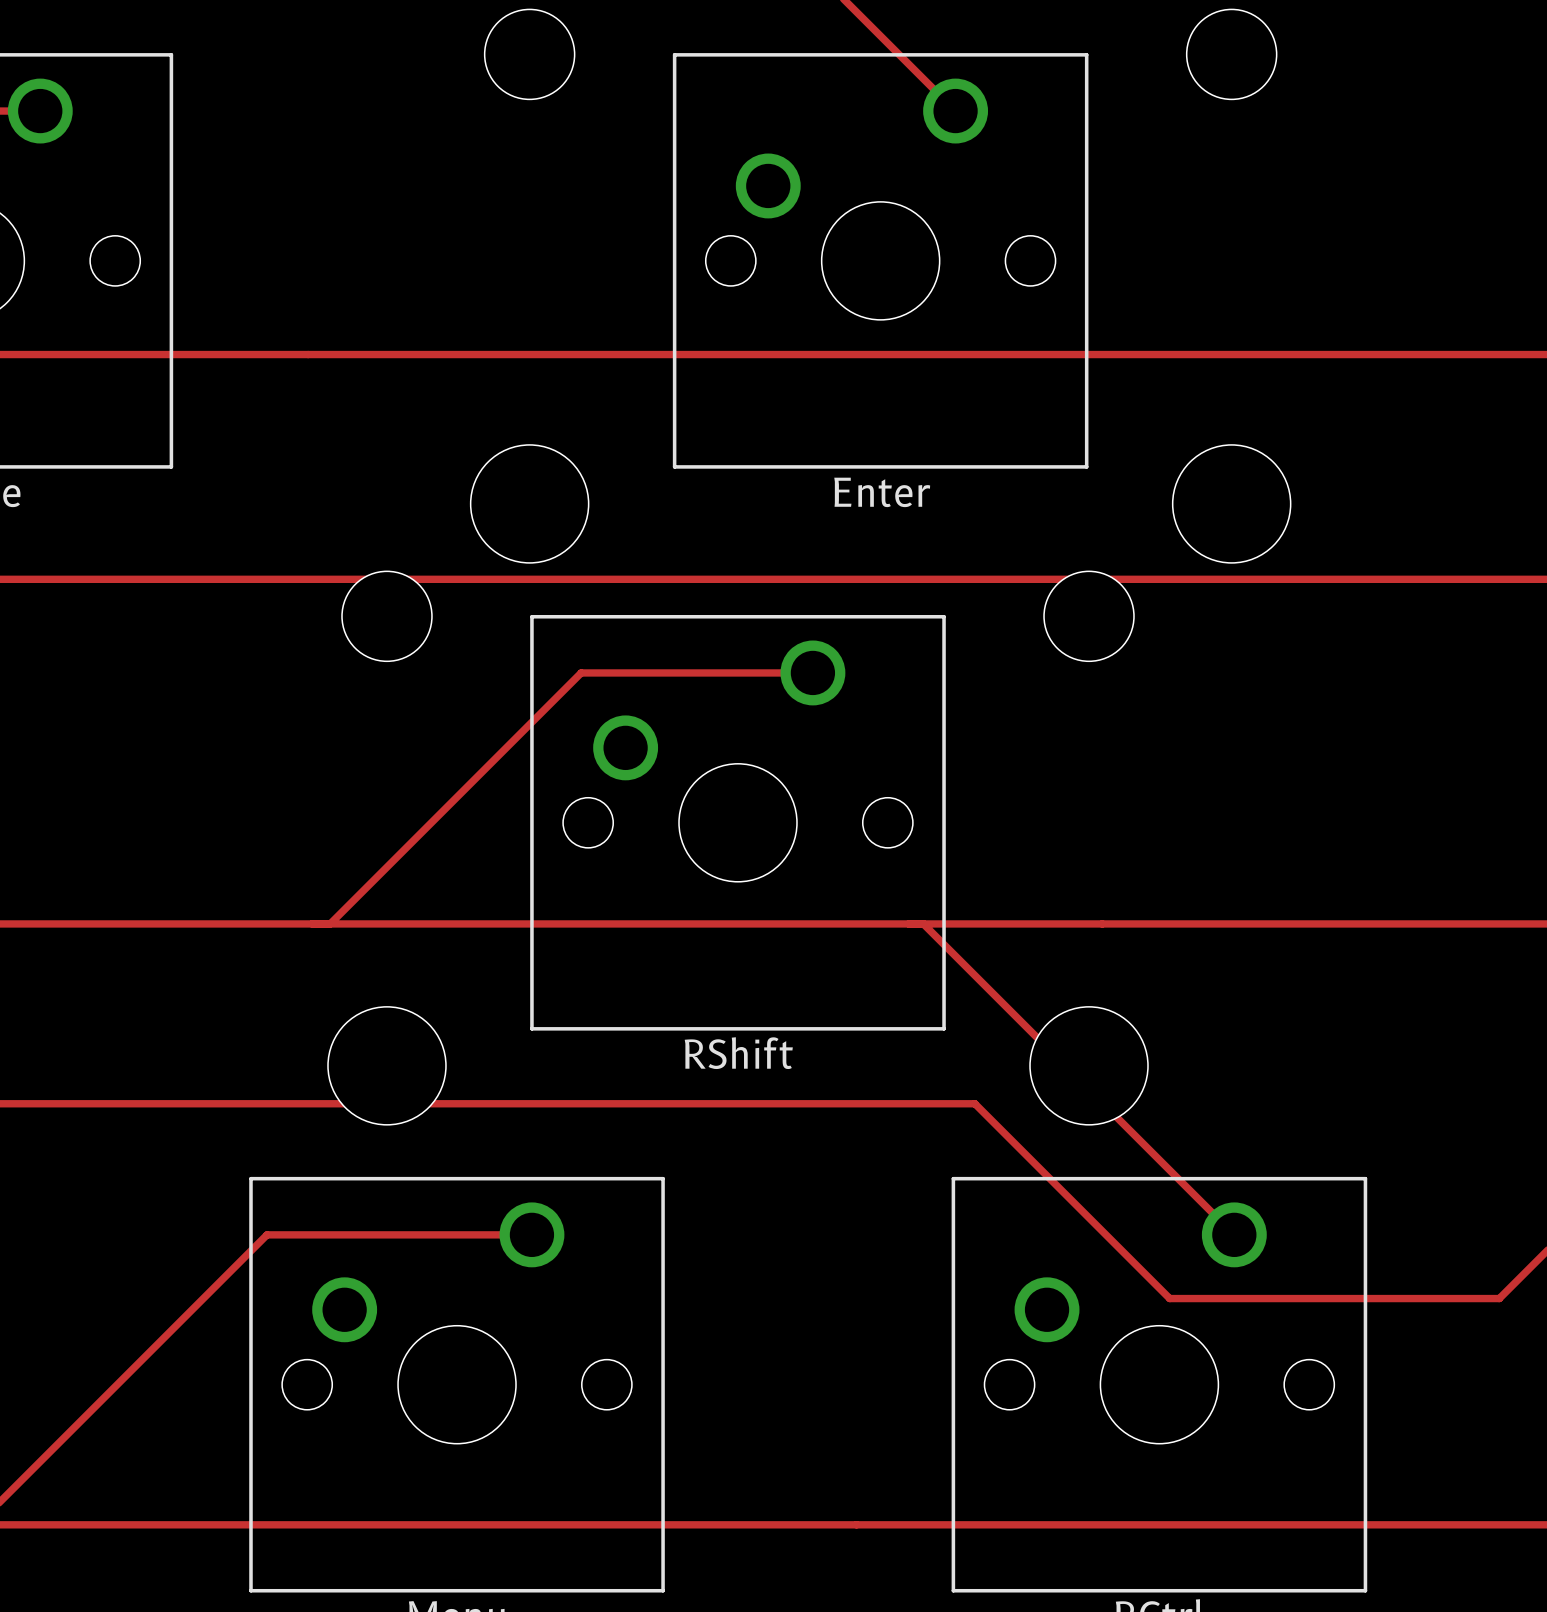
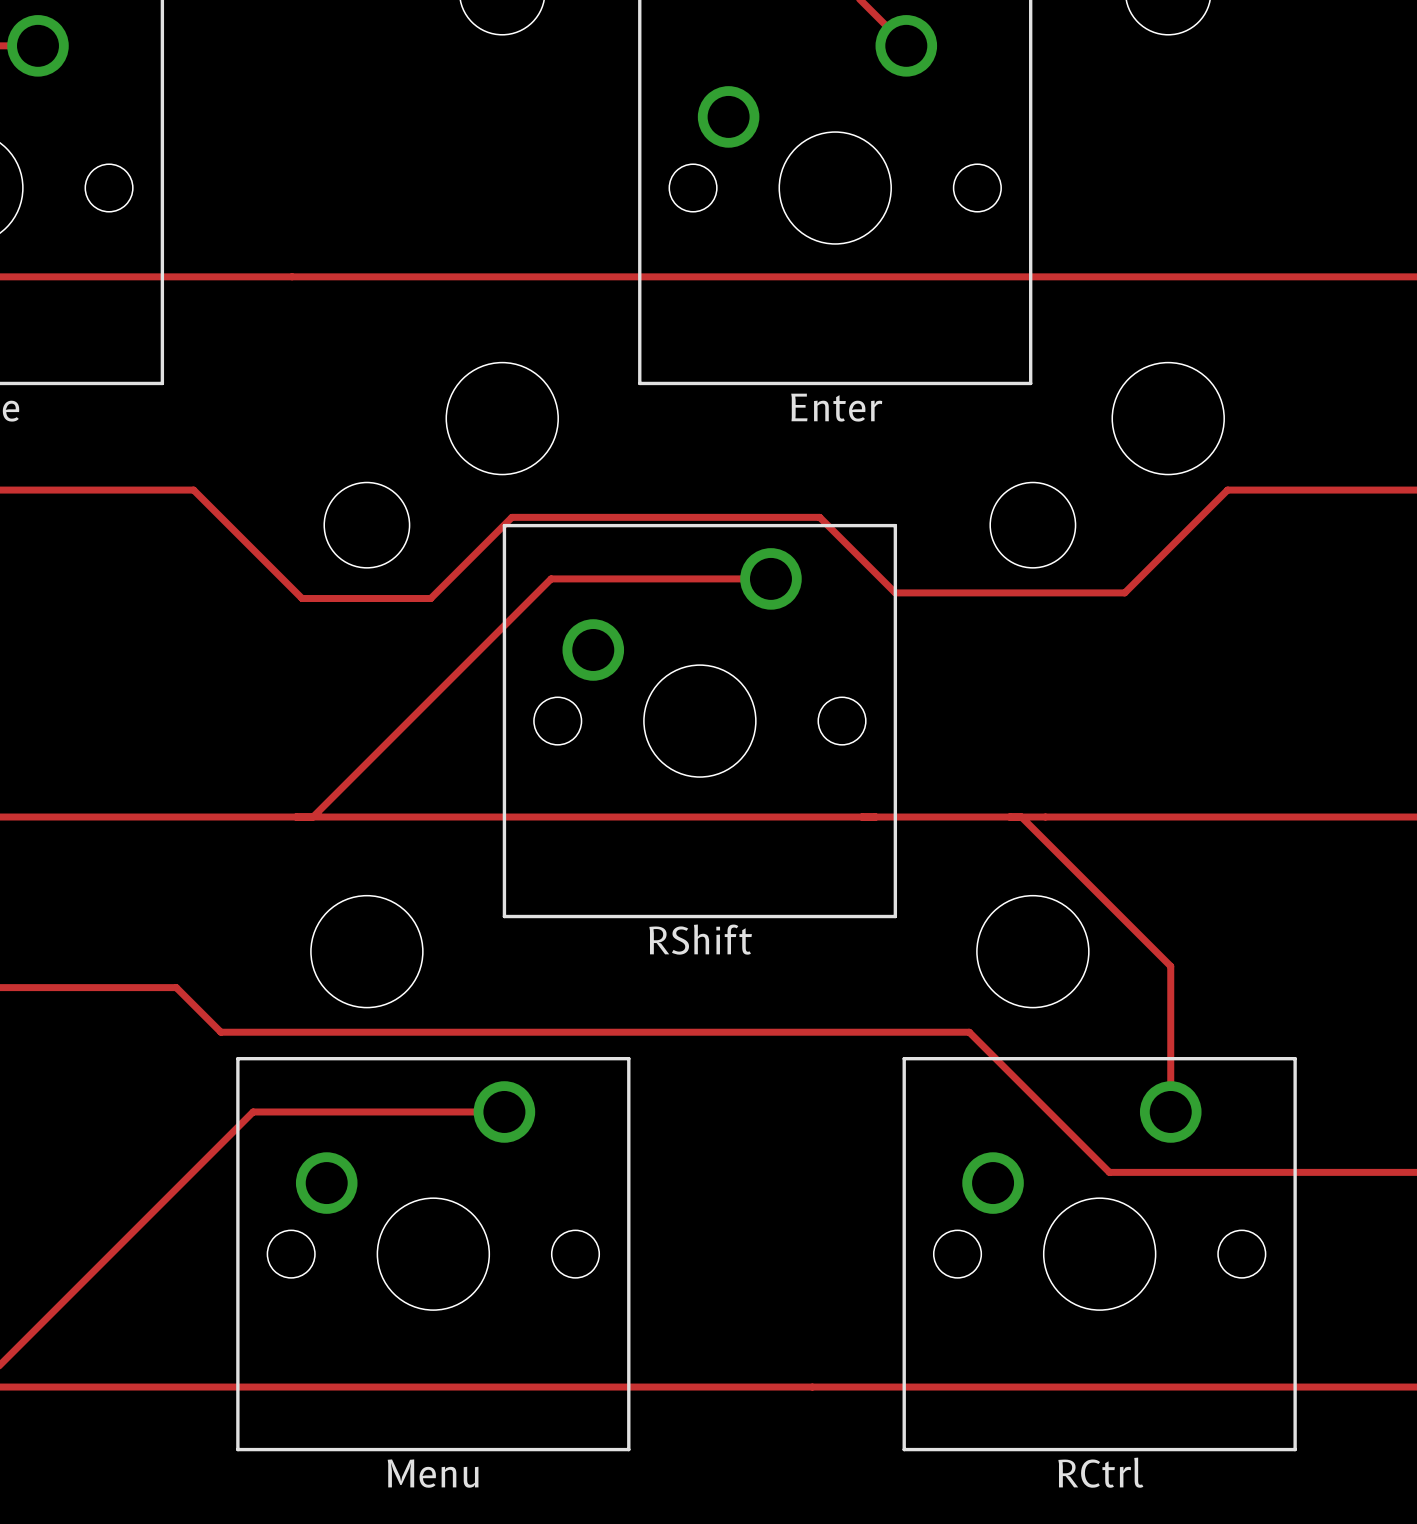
track: (204, 579) (1294, 579) -> (193, 490) (302, 598) (430, 598) (511, 517) (819, 517) (895, 592) (1124, 592) (1227, 490)
track: (923, 923) (1234, 1234) -> (1021, 817) (1170, 966) (1170, 1111)
track: (186, 1103) (974, 1103) (1021, 1150) -> (176, 987) (220, 1032) (969, 1032)

